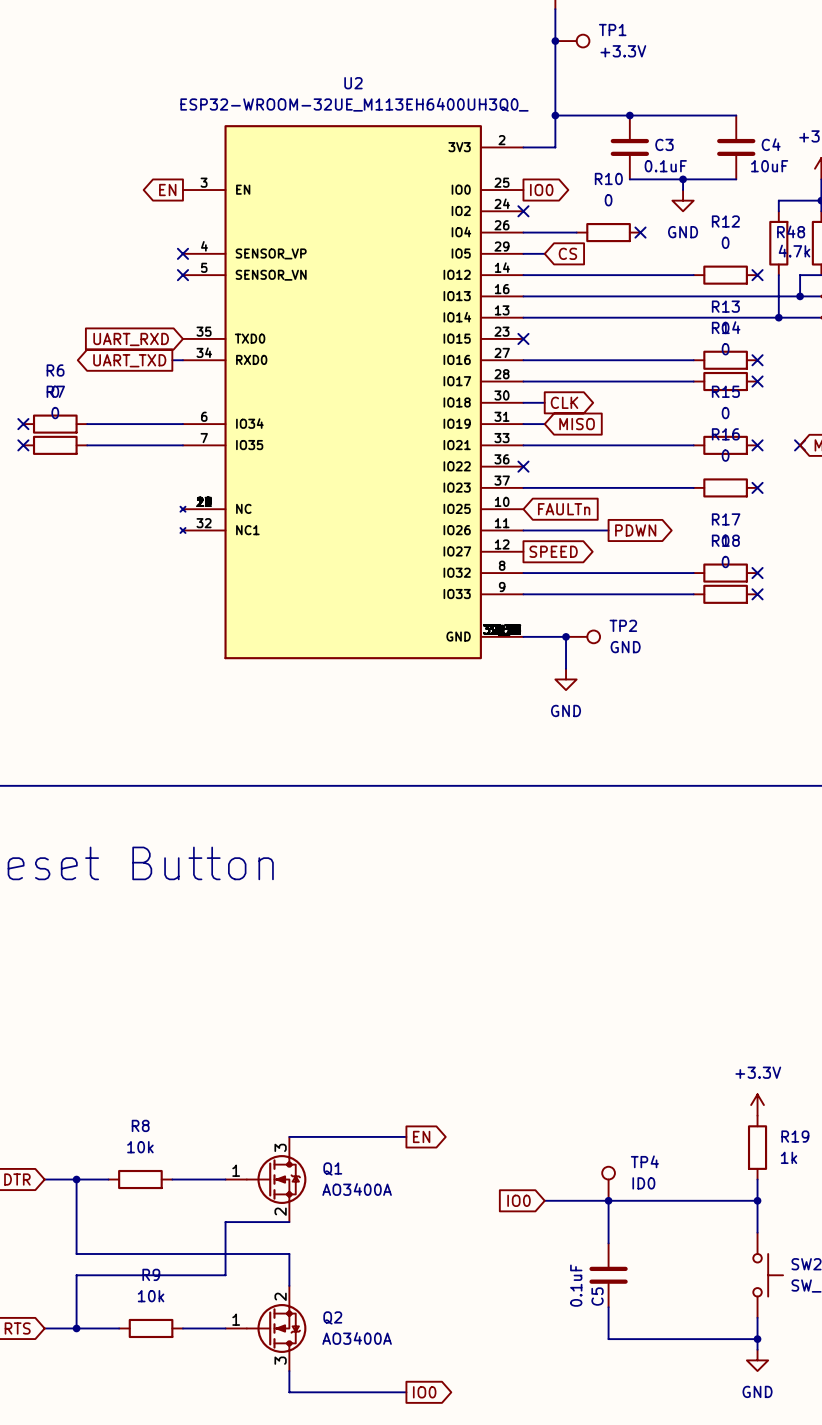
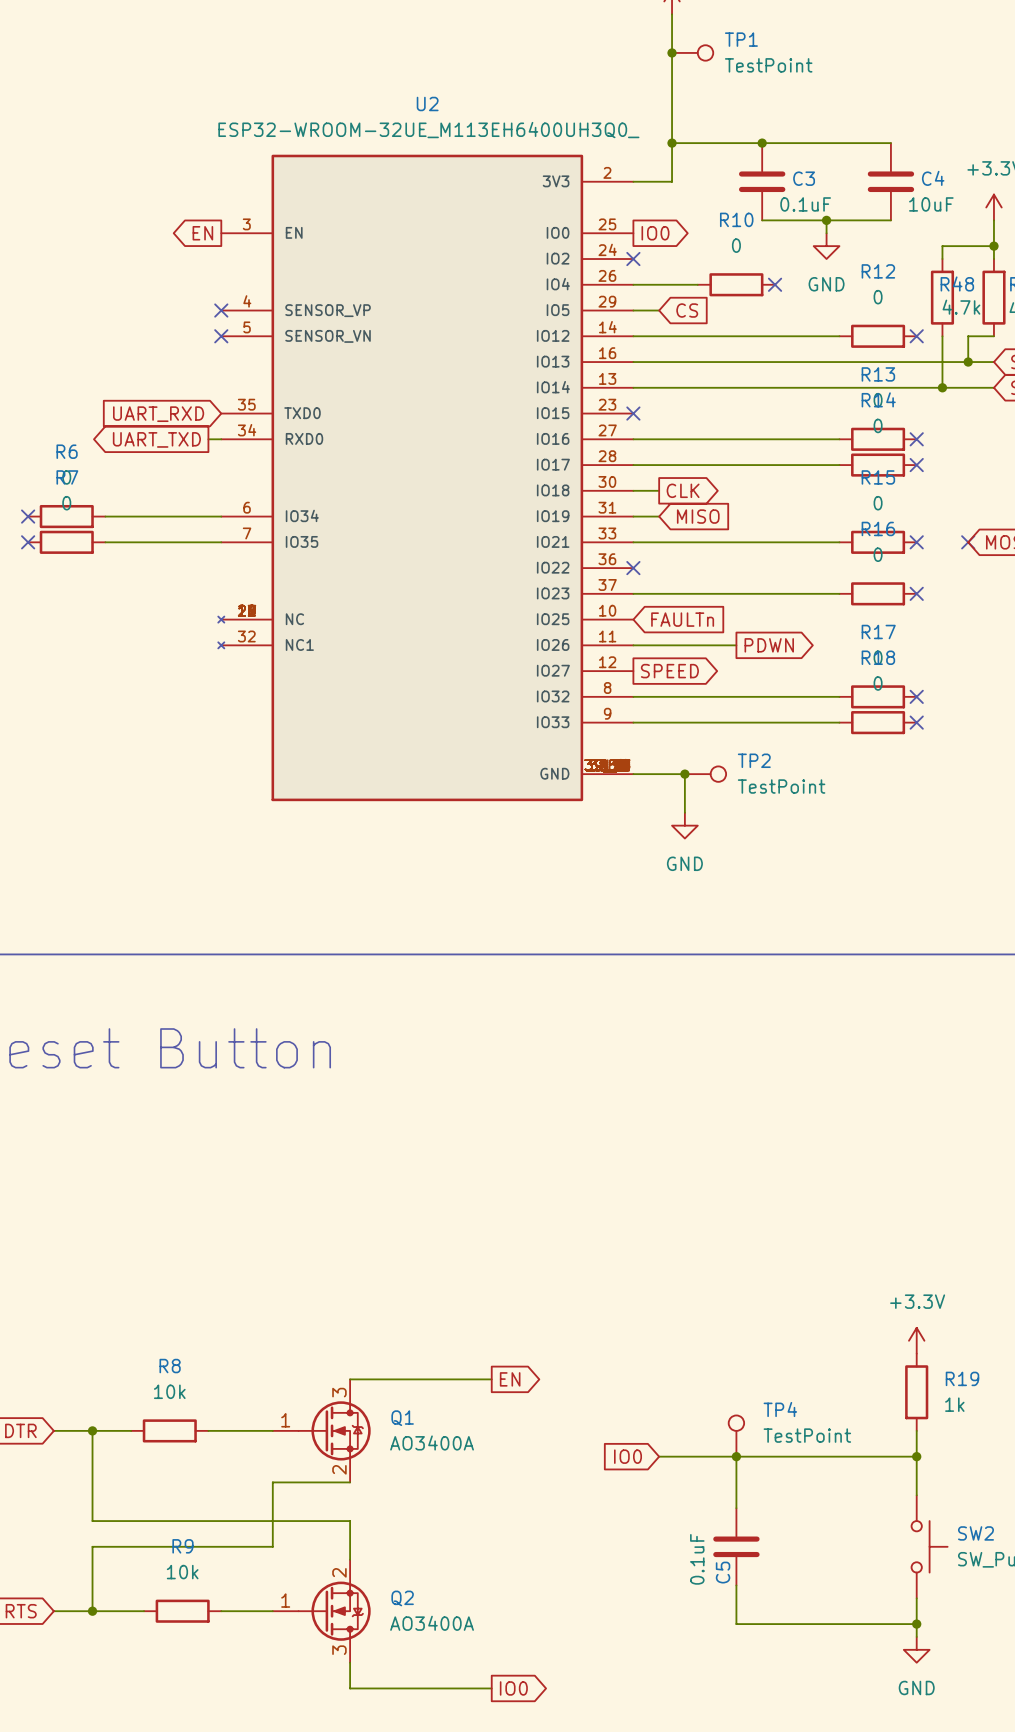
TP1 value: +3.3V (623, 51) -> TestPoint (768, 65)
TP2 value: GND (625, 647) -> TestPoint (781, 786)
TP4 value: ID0 (643, 1183) -> TestPoint (807, 1435)

